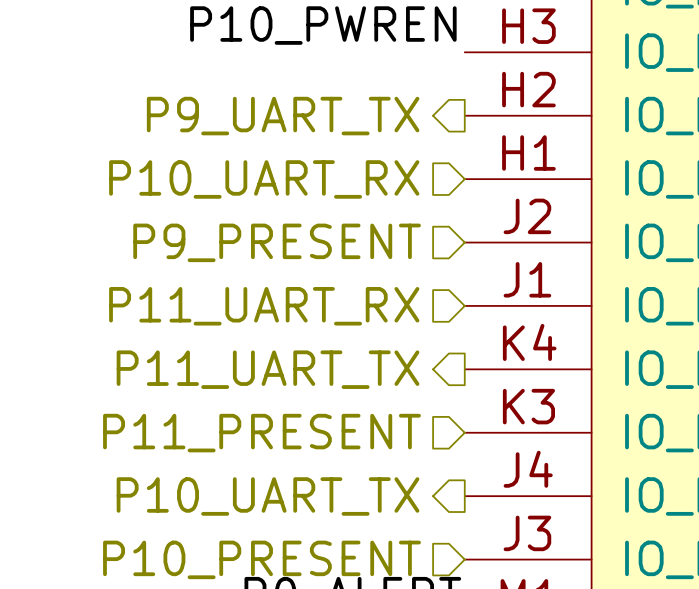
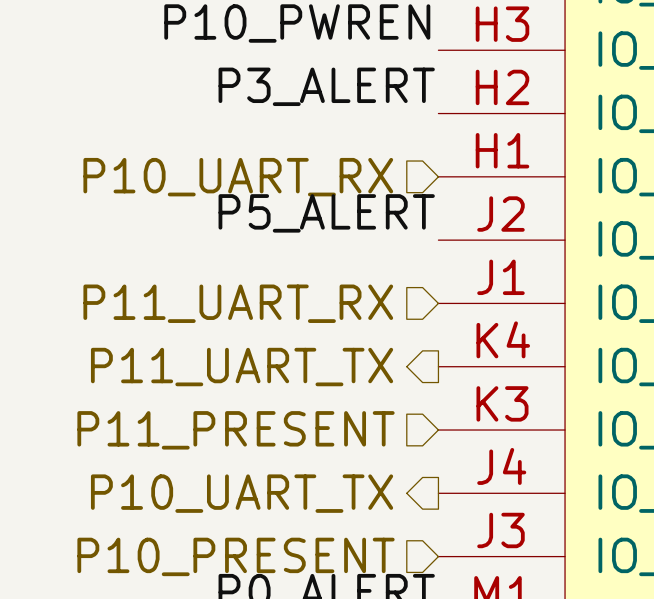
label: none -> P3_ALERT (326, 86)
hierarchical label: P9_UART_TX (283, 116) -> none
label: none -> P5_ALERT (326, 213)
hierarchical label: P9_PRESENT (277, 242) -> none

